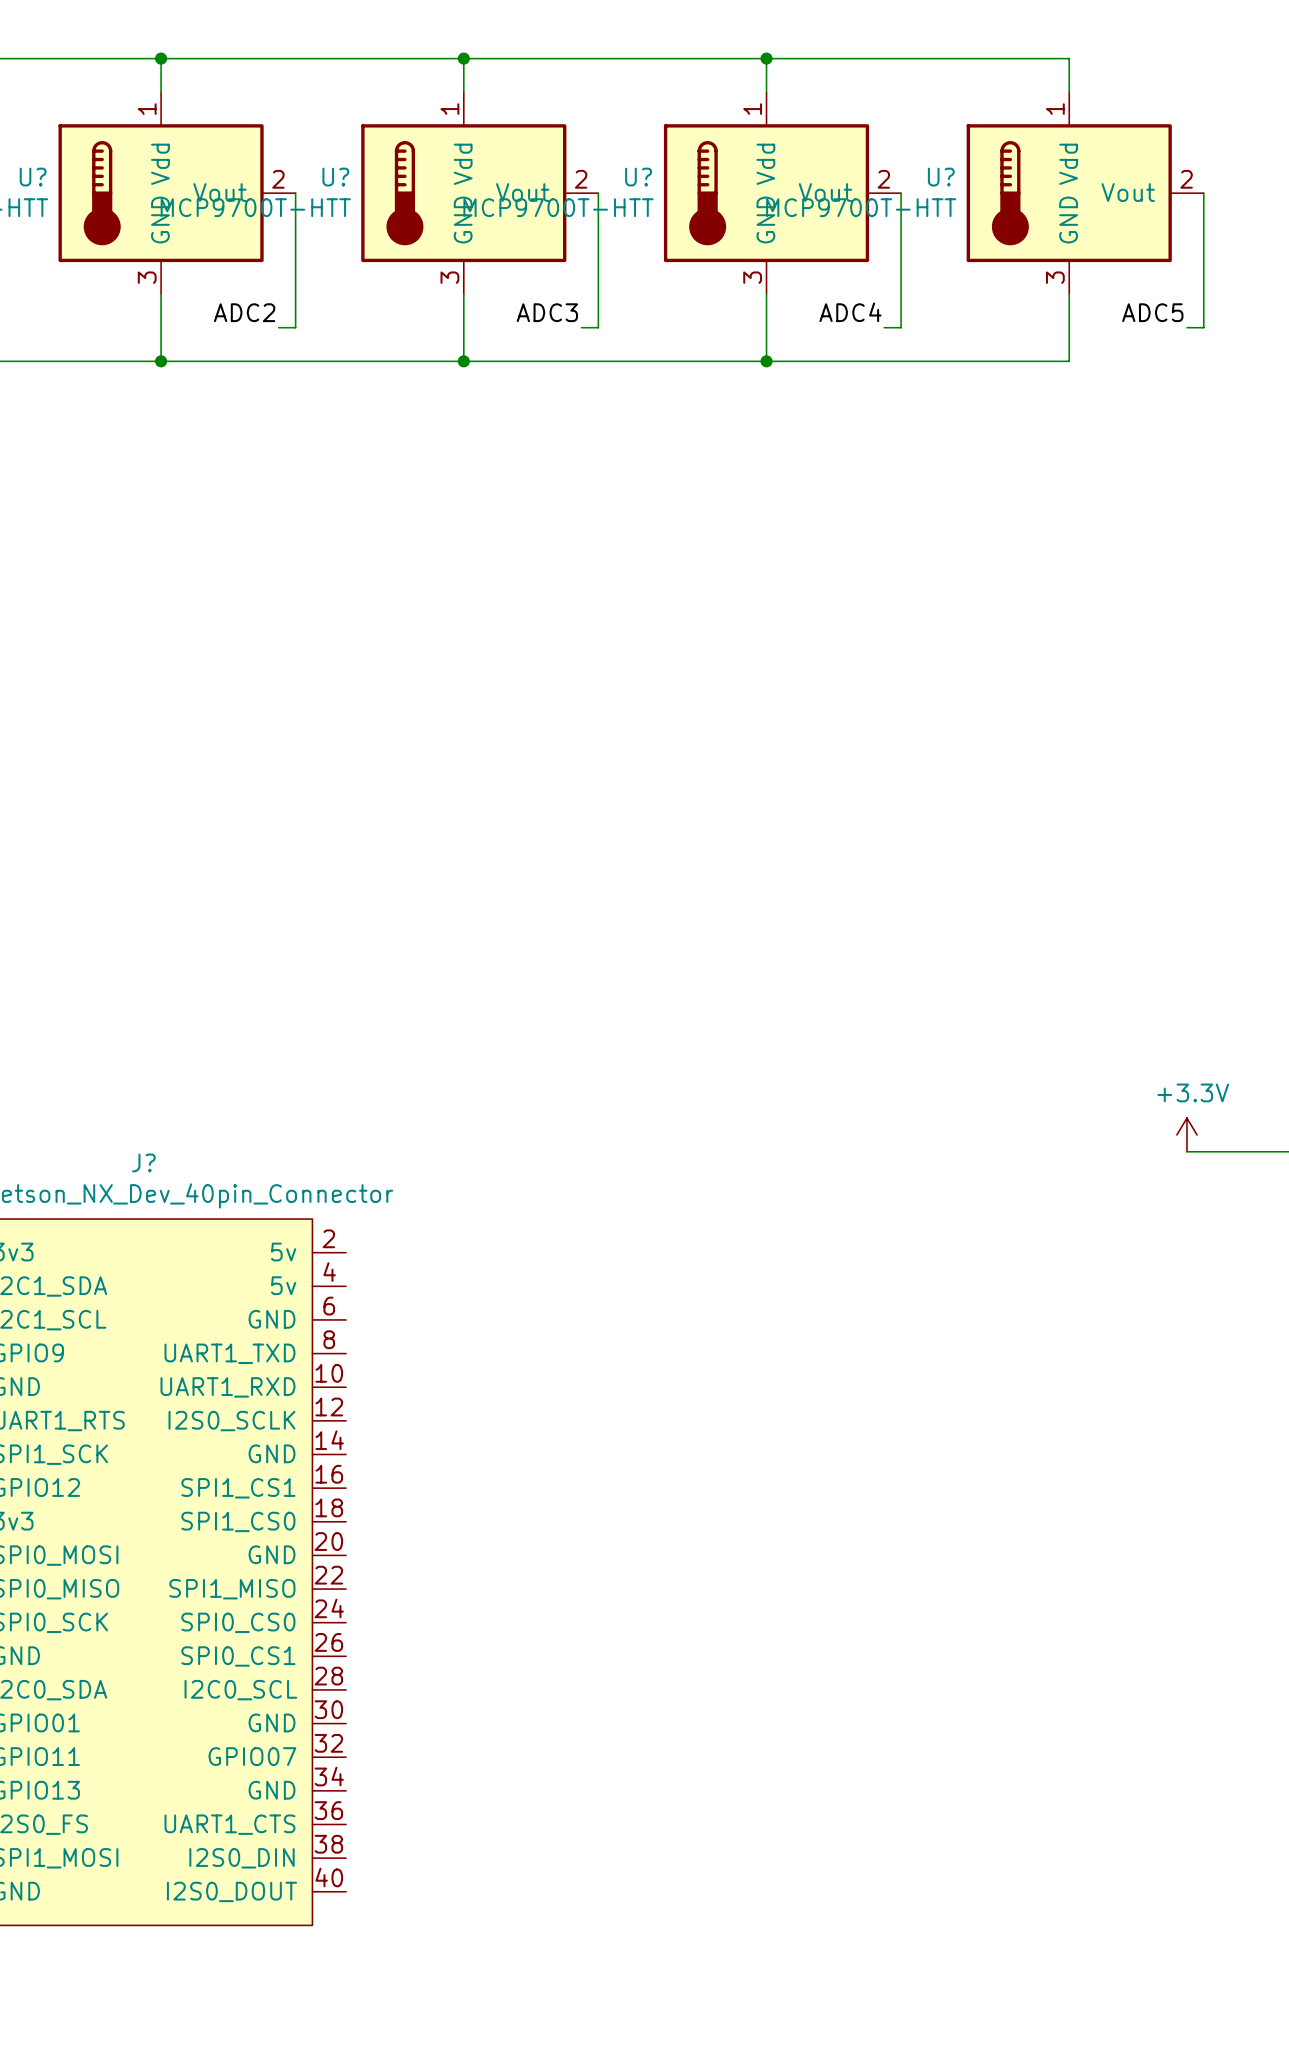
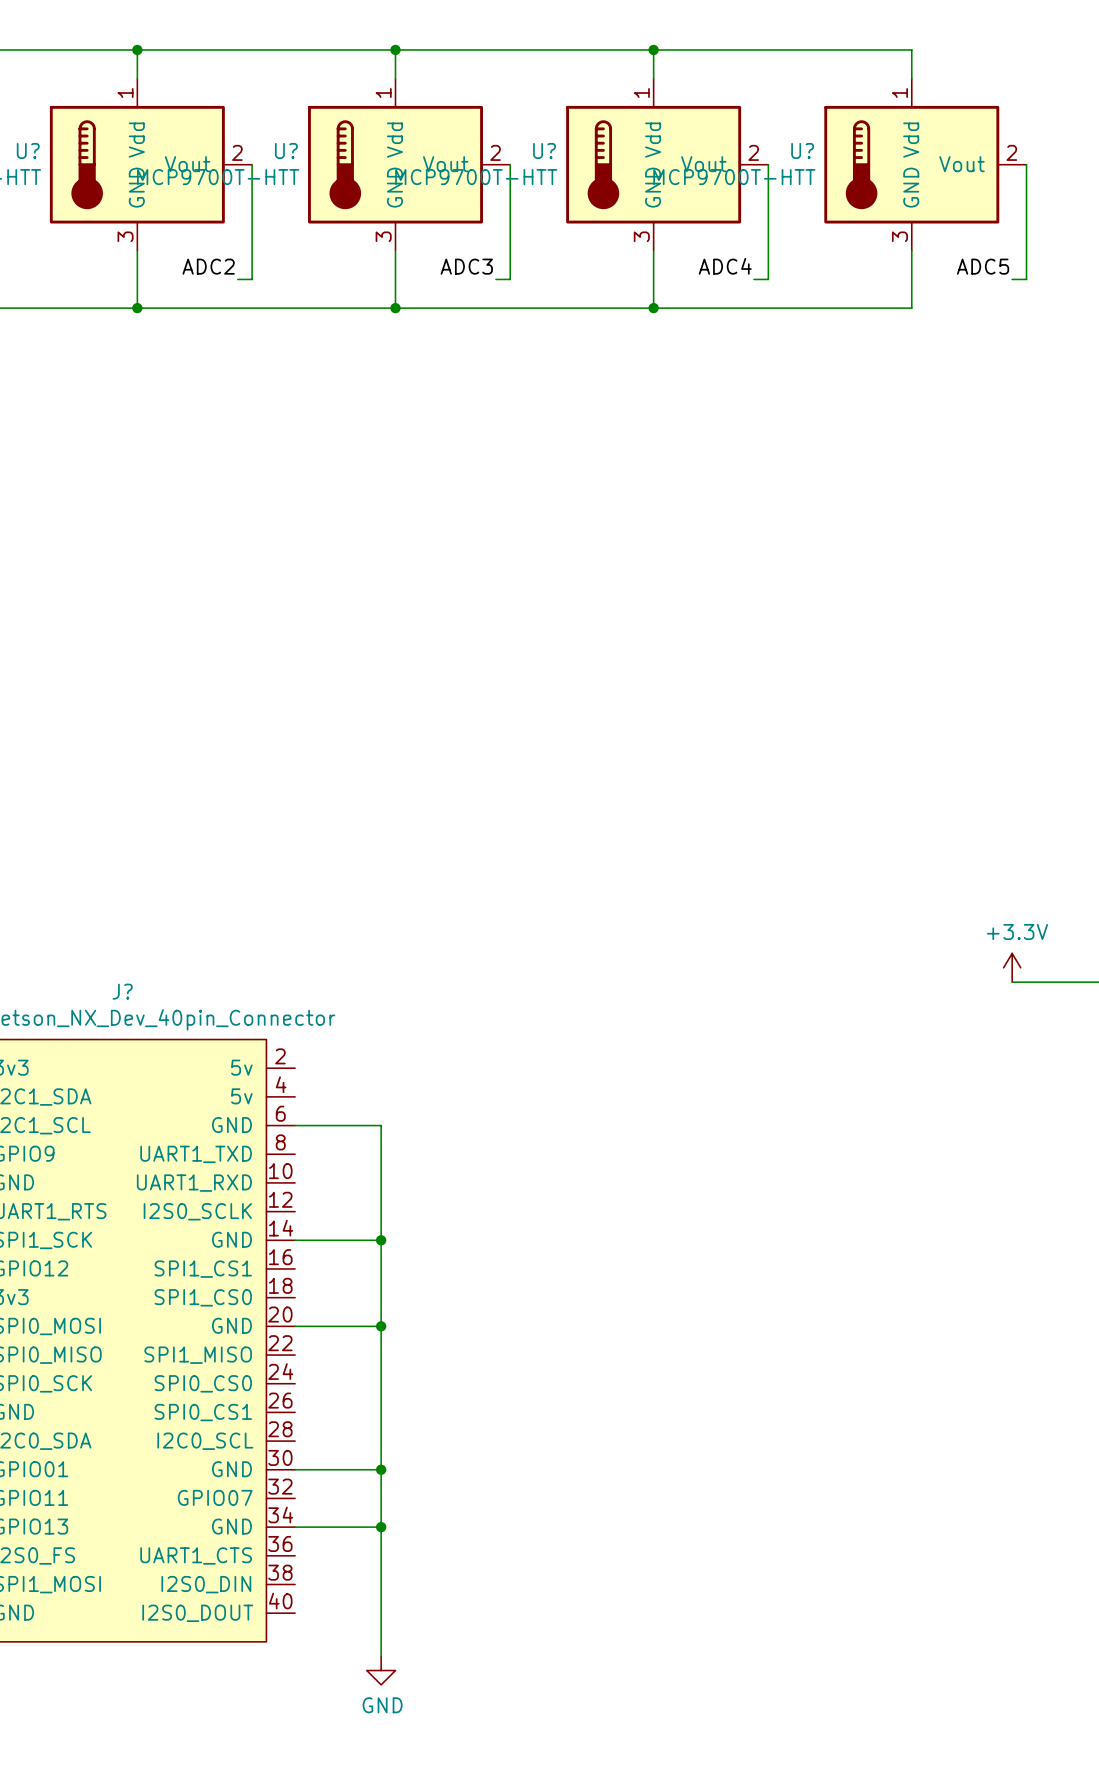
wire: none -> (295, 1125) (381, 1125) (381, 1656)
wire: none -> (295, 1240) (381, 1240)
junction: none -> (381, 1240)
wire: none -> (295, 1326) (381, 1326)
junction: none -> (381, 1326)
wire: none -> (295, 1469) (381, 1469)
junction: none -> (381, 1469)
wire: none -> (295, 1527) (381, 1527)
junction: none -> (381, 1527)
power symbol: none -> GND (381, 1670)

